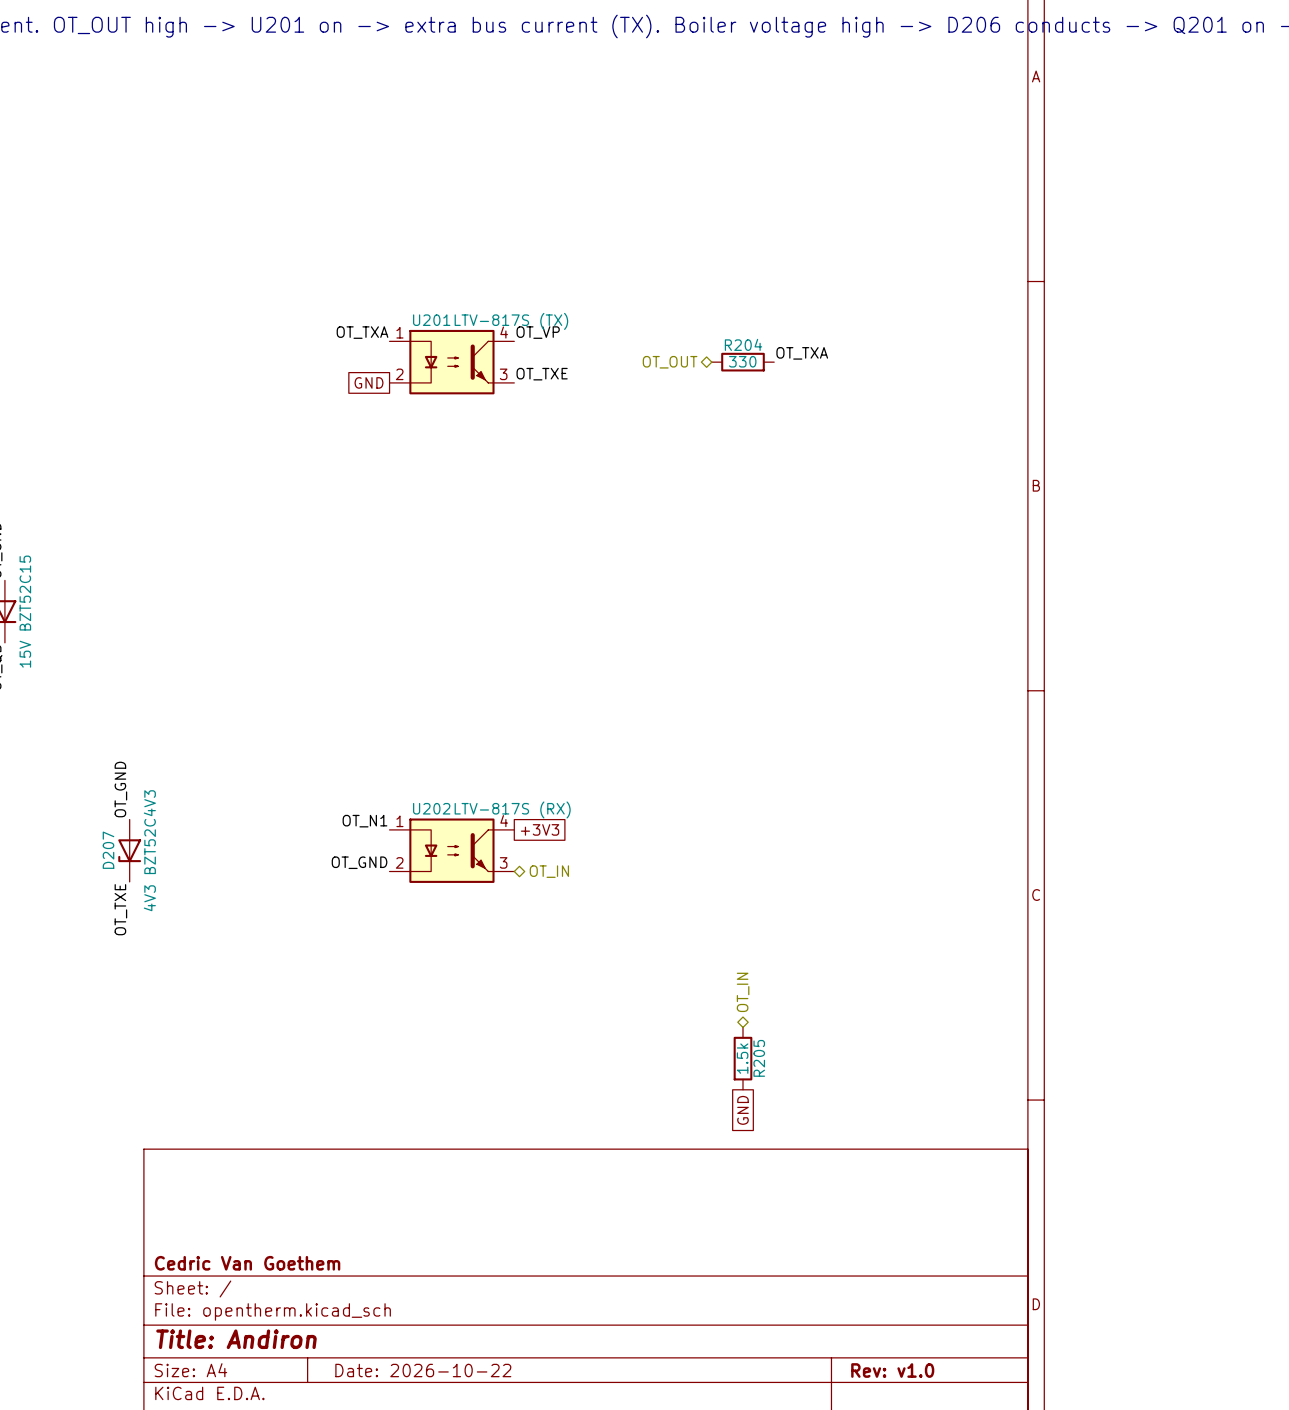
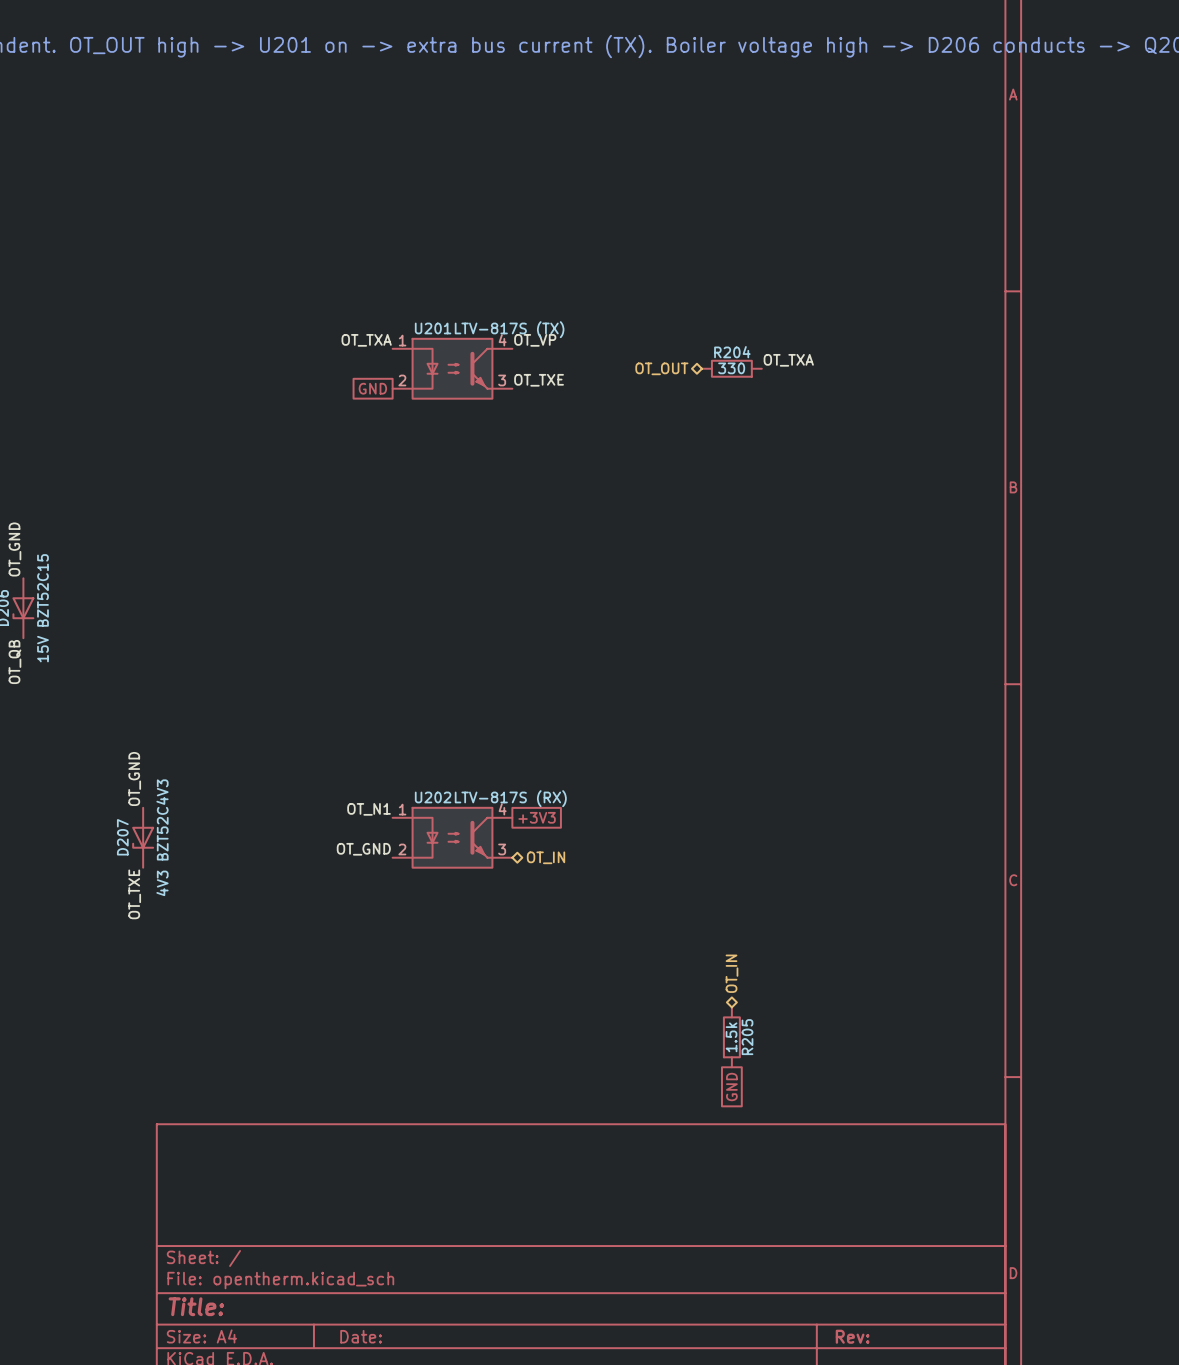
title block: Cedric Van Goethem (247, 1263) -> none
title block: Title: Andiron (236, 1339) -> Title: (196, 1306)
title block: Date: 2026-10-22 (423, 1370) -> Date: (361, 1336)
title block: Rev: v1.0 (892, 1370) -> Rev: (852, 1336)

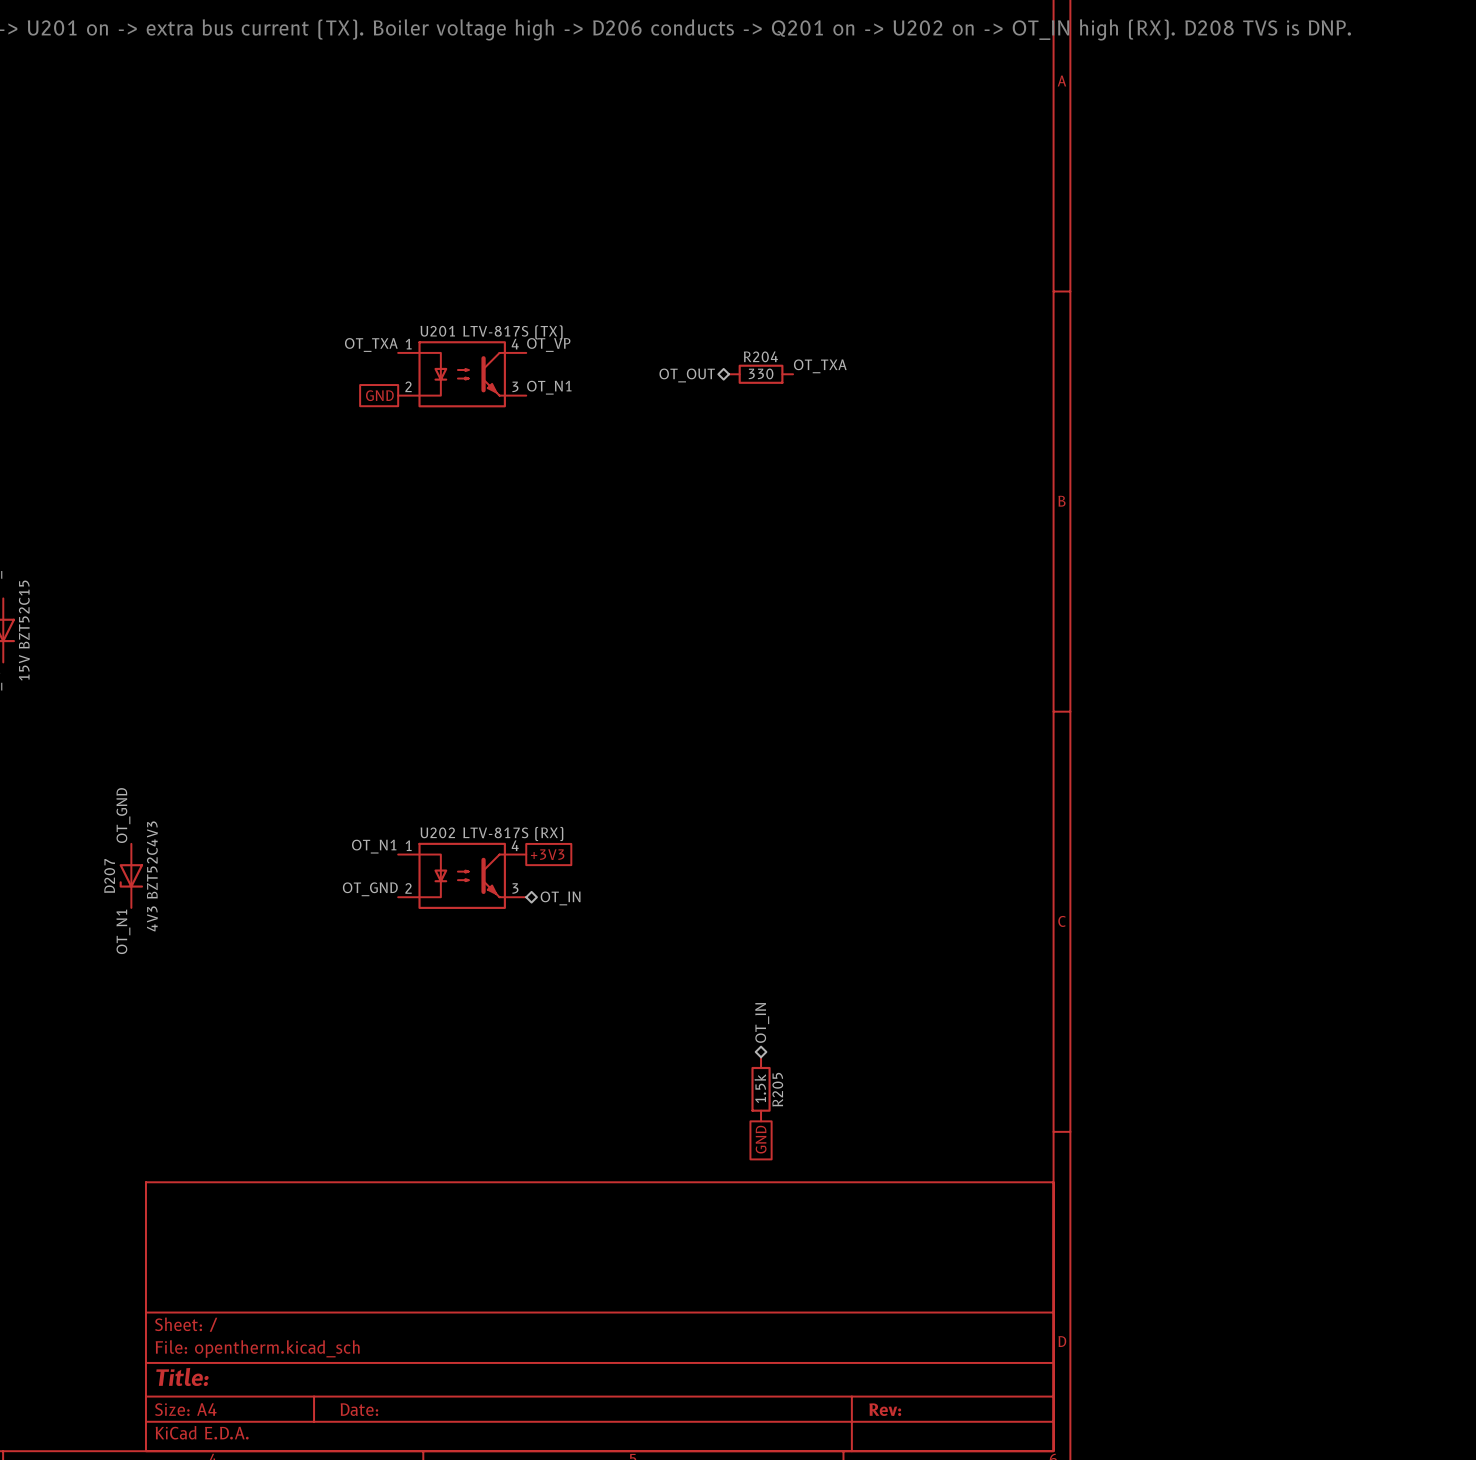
label: OT_TXE (539, 380) -> OT_N1 (549, 387)
label: OT_TXE (134, 894) -> OT_N1 (123, 931)

